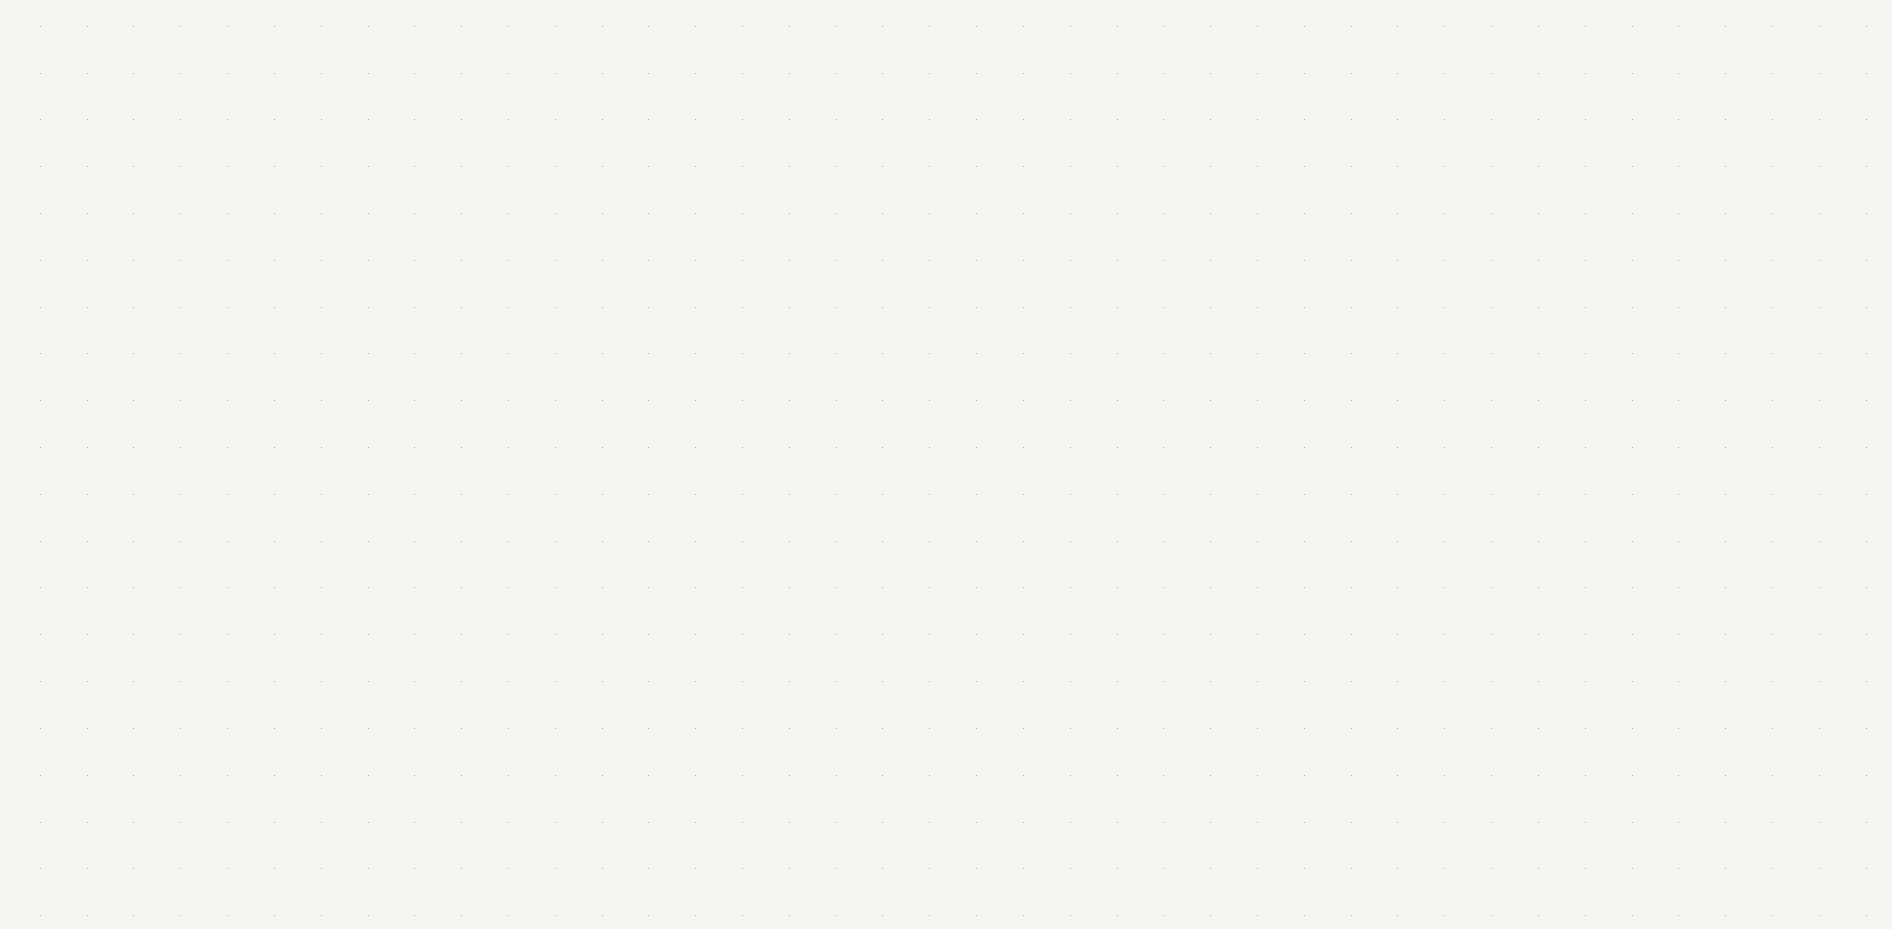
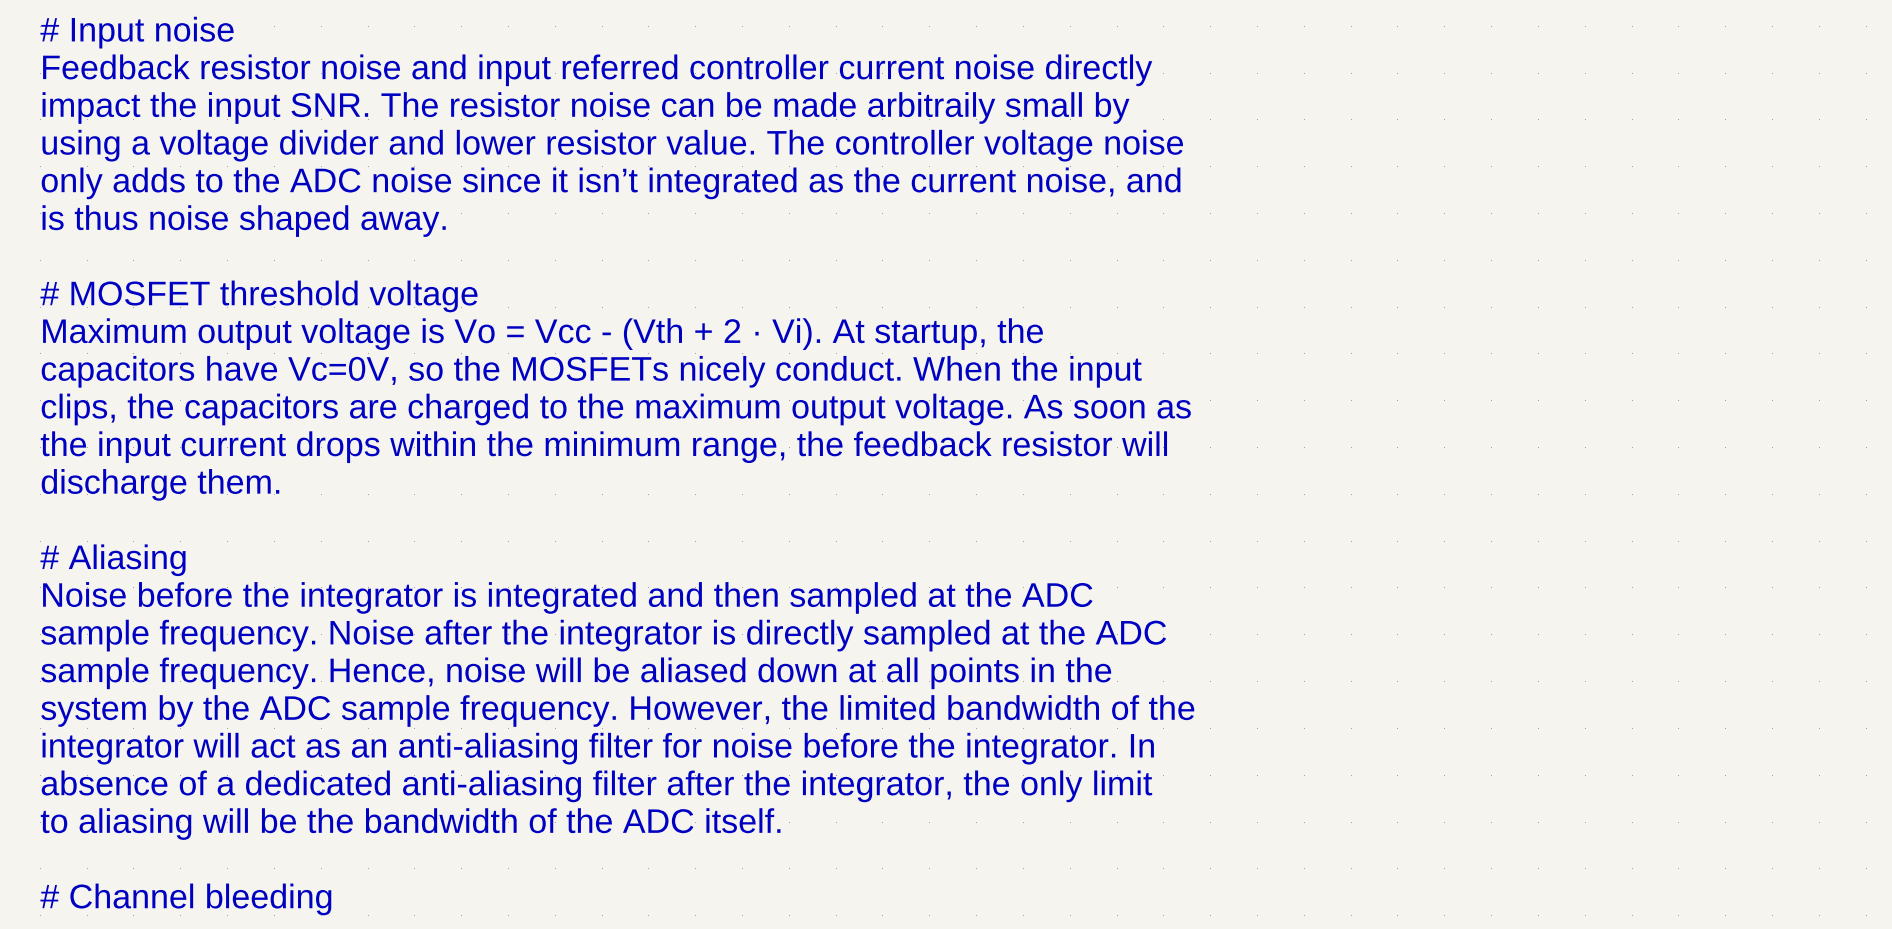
text: none -> # Input noise (137, 32)
text: none -> Feedback resistor noise and input referred controller current noise directly (597, 70)
text: none -> impact the input SNR. The resistor noise can be made arbitraily small by (586, 107)
text: none -> using a voltage divider and lower resistor value. The controller voltage noise (612, 145)
text: none -> only adds to the ADC noise since it isn’t integrated as the current noise, and (611, 183)
text: none -> is thus noise shaped away. (244, 221)
text: none -> # MOSFET threshold voltage (258, 296)
text: none -> Maximum output voltage is Vo = Vcc - (Vth + 2 · Vi). At startup, the (543, 334)
text: none -> capacitors have Vc=0V, so the MOSFETs nicely conduct. When the input (591, 371)
text: none -> clips, the capacitors are charged to the maximum output voltage. As soon as (616, 409)
text: none -> the input current drops within the minimum range, the feedback resistor will (603, 447)
text: none -> discharge them. (160, 484)
text: none -> # Aliasing (113, 560)
text: none -> Noise before the integrator is integrated and then sampled at the ADC (567, 597)
text: none -> sample frequency. Noise after the integrator is directly sampled at the ADC (603, 635)
text: none -> sample frequency. Hence, noise will be aliased down at all points in the (576, 673)
text: none -> system by the ADC sample frequency. However, the limited bandwidth of the (617, 710)
text: none -> integrator will act as an anti-aliasing filter for noise before the integrator. In (598, 748)
text: none -> absence of a dedicated anti-aliasing filter after the integrator, the only limit (596, 786)
text: none -> to aliasing will be the bandwidth of the ADC itself. (410, 824)
text: none -> # Channel bleeding (185, 899)

